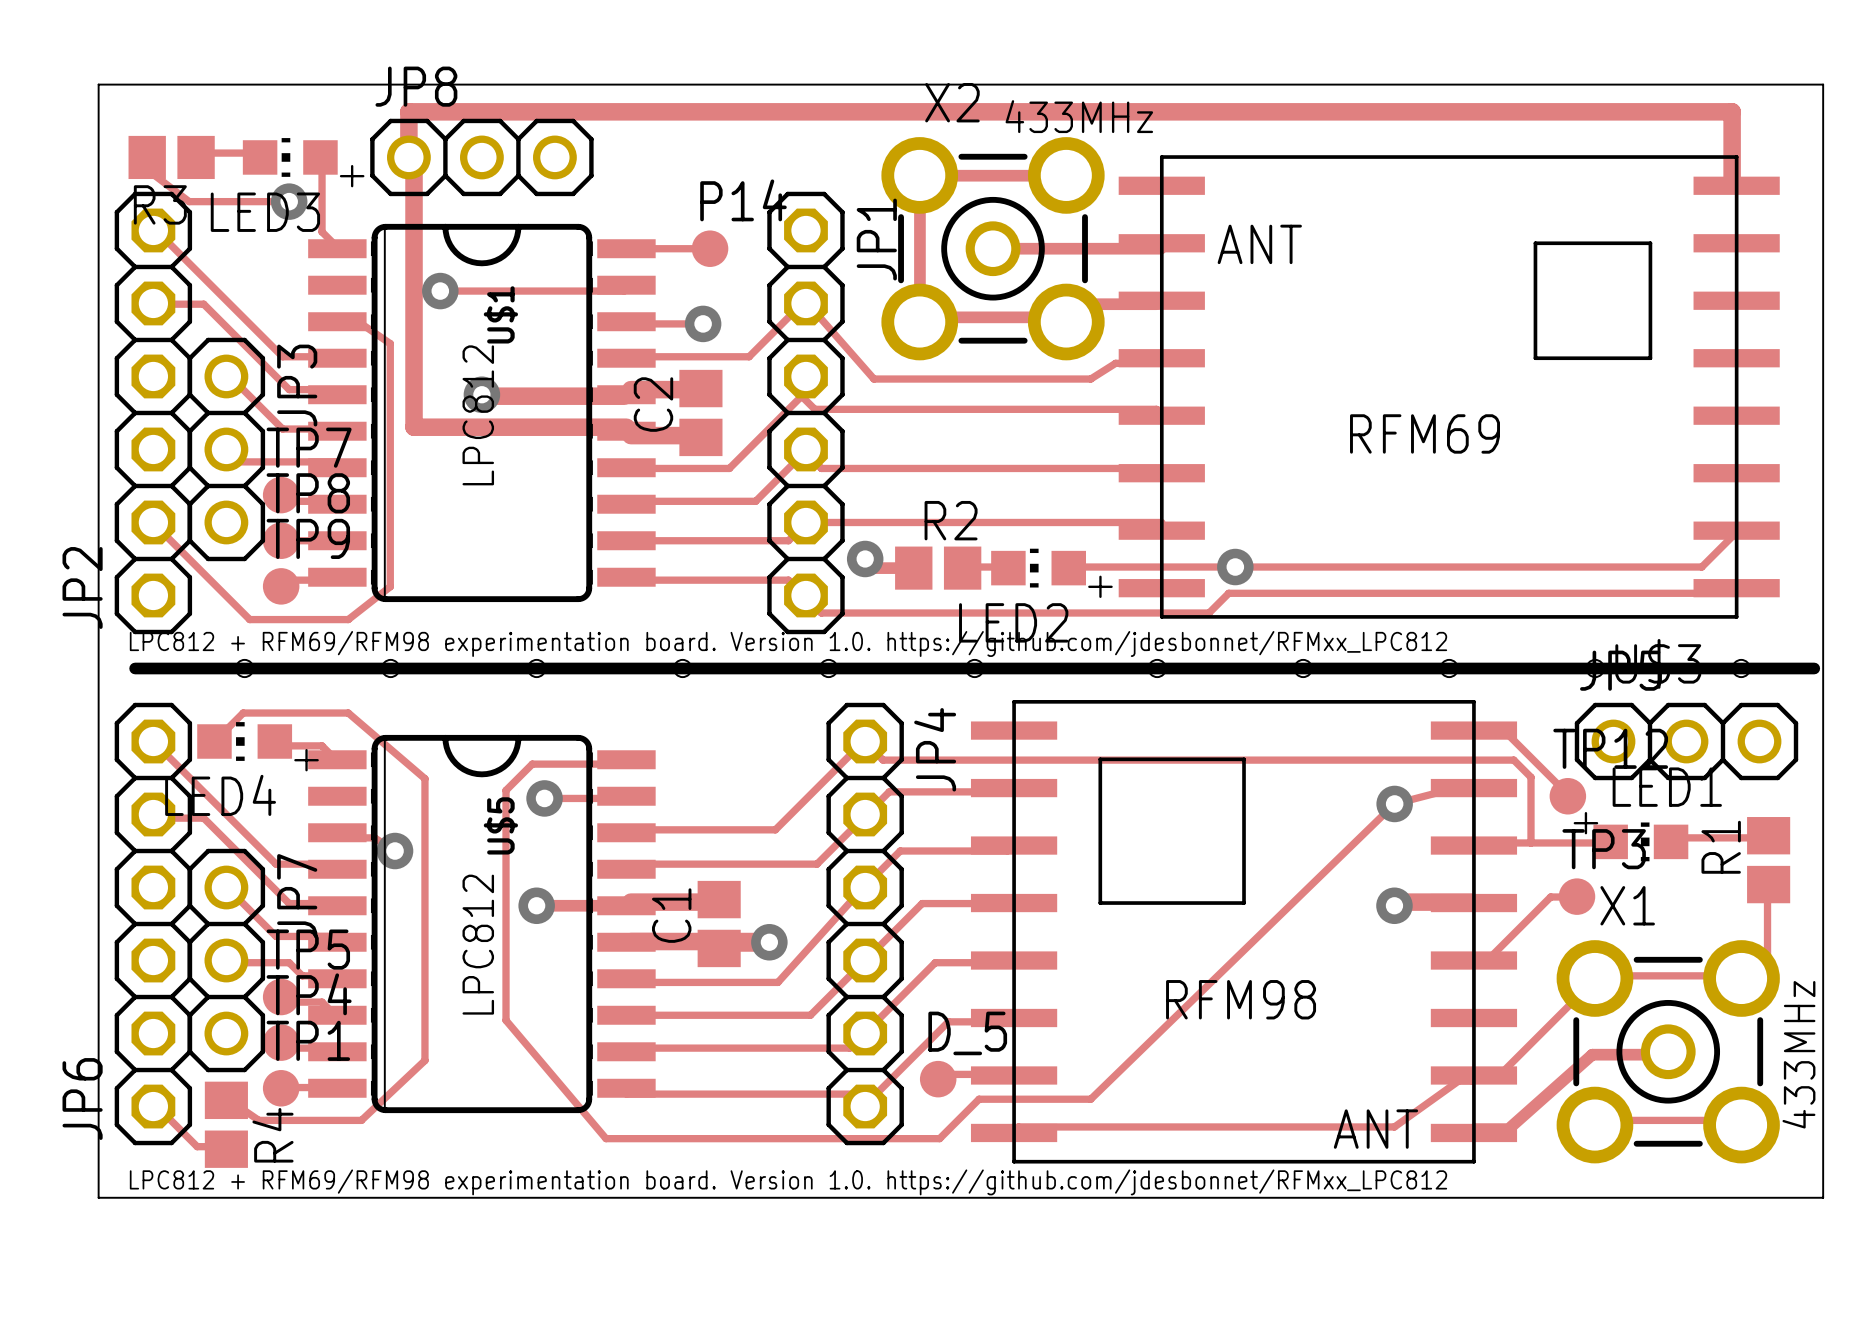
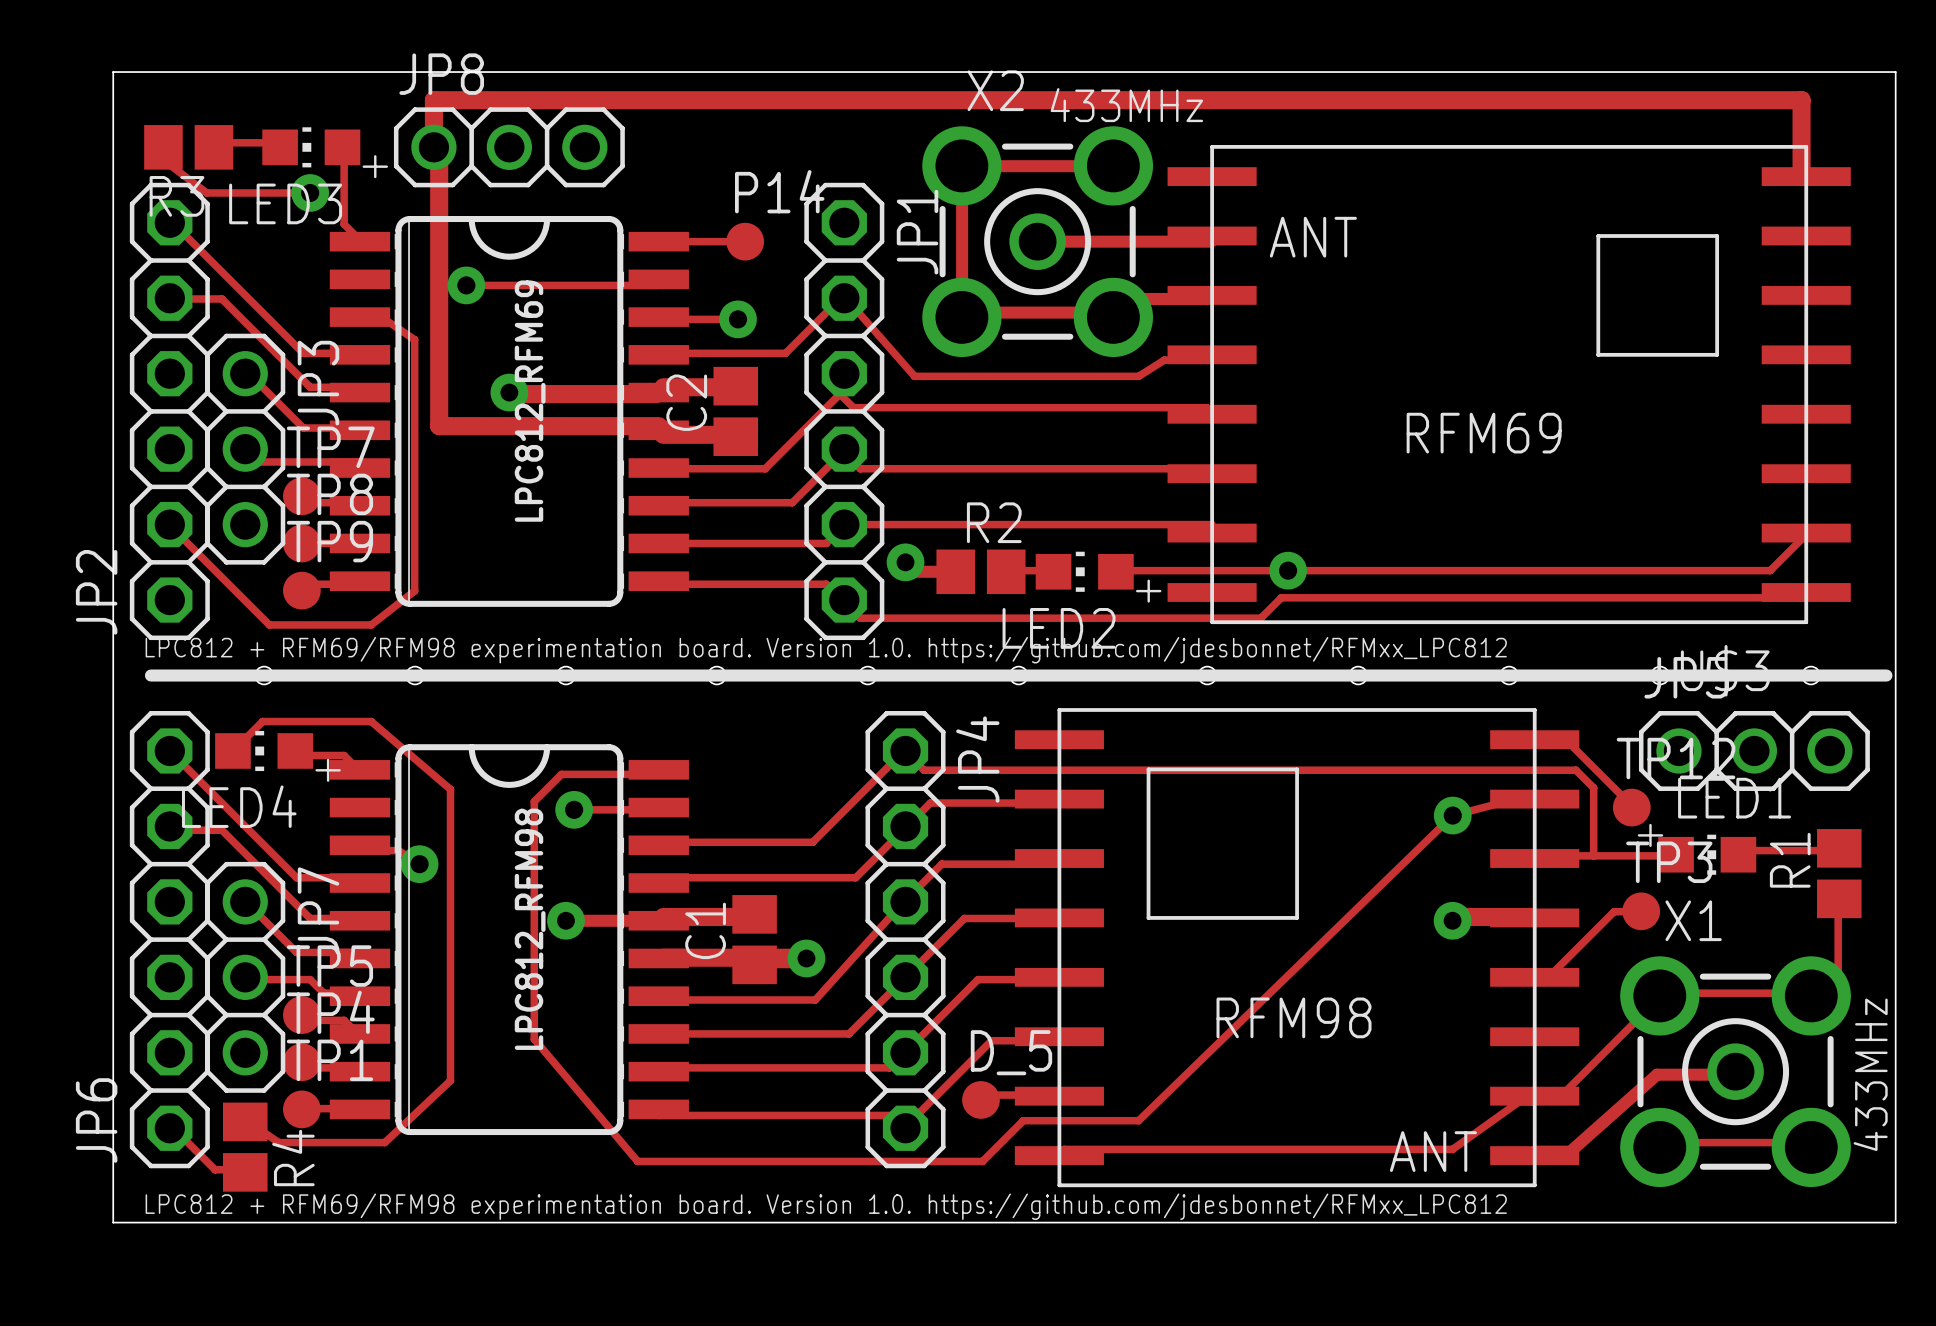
U$1 name: U$1 (500, 314) -> LPC812_RFM69 (530, 401)
text: LPC812 (478, 415) -> none
U$5 name: U$5 (500, 825) -> LPC812_RFM98 (530, 929)
text: LPC812 (478, 944) -> none

